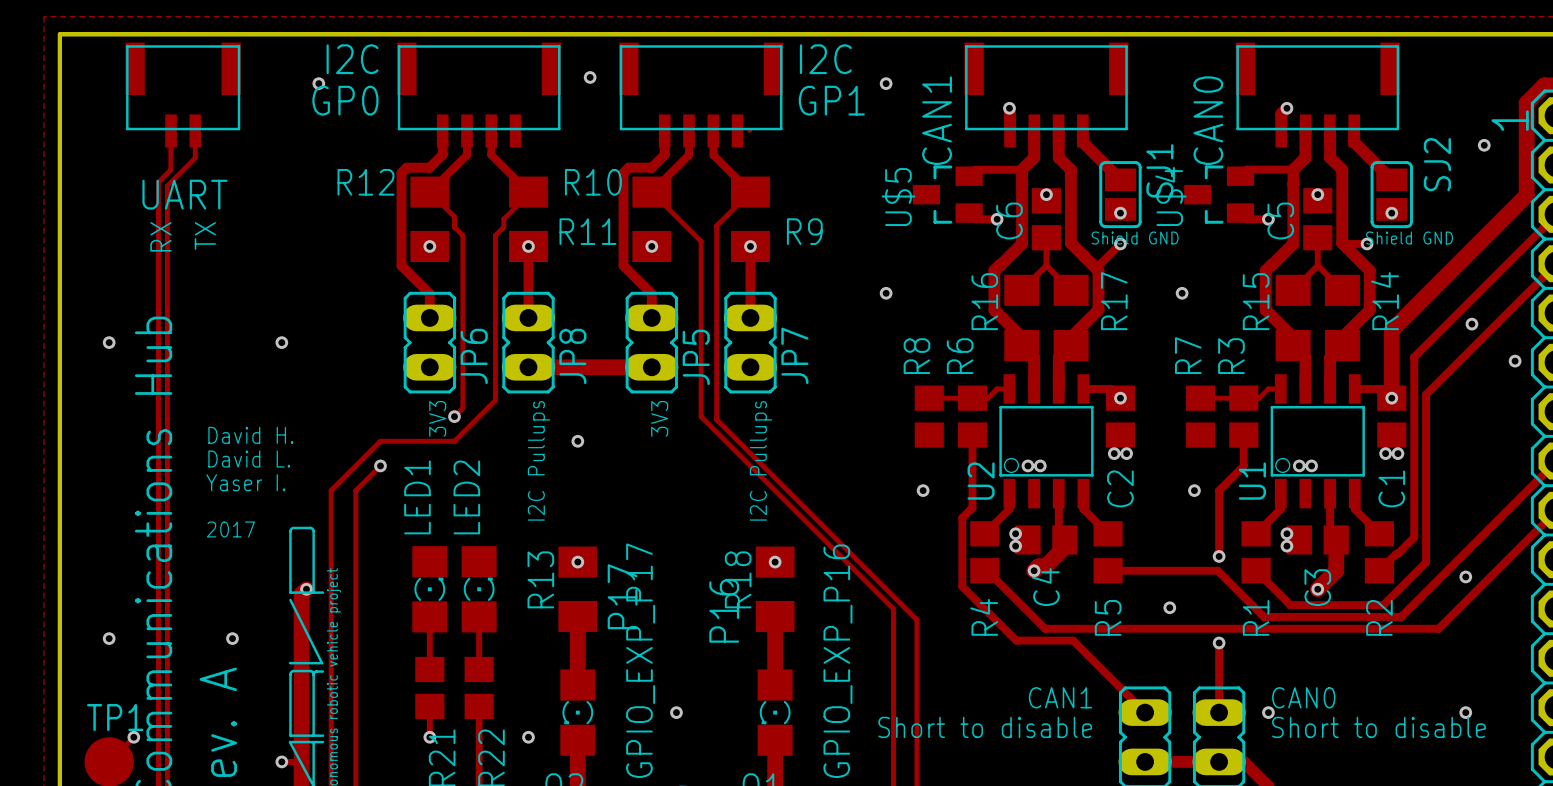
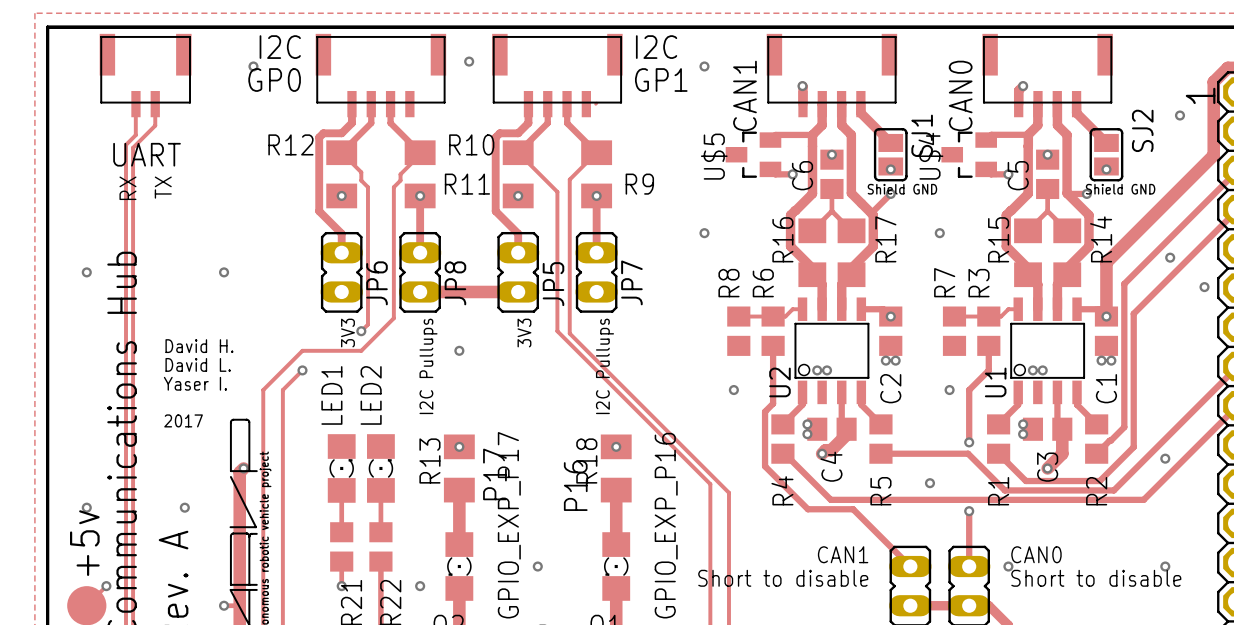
text: none -> +5v (84, 543)
TP1 name: TP1 (115, 717) -> none

